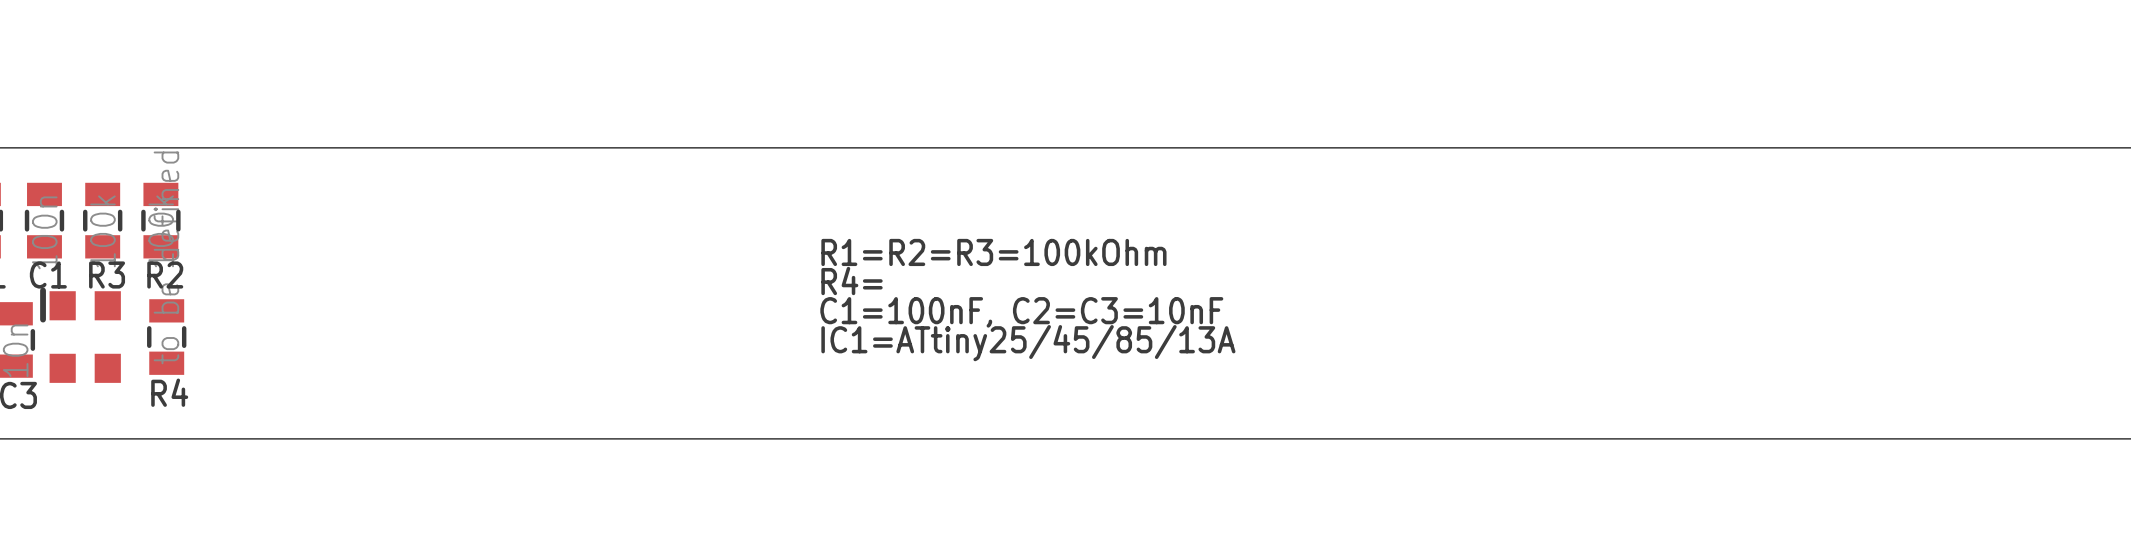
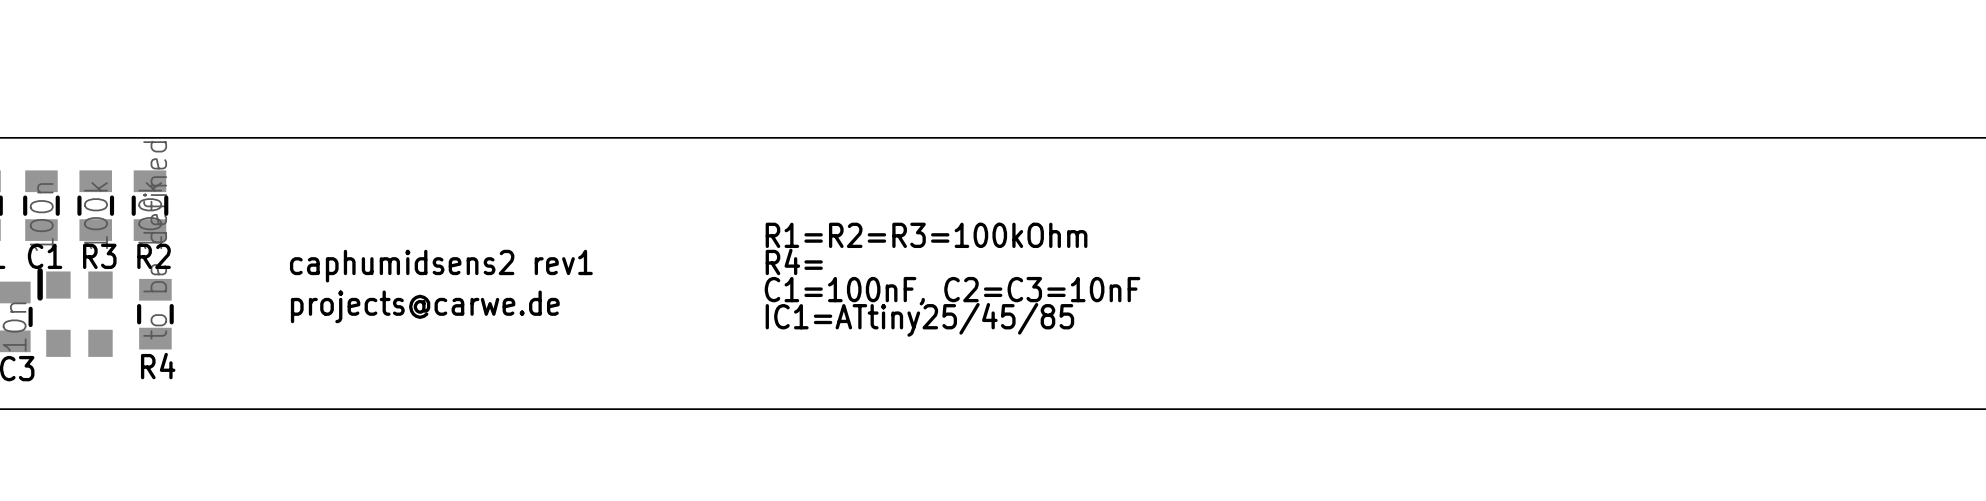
text: none -> caphumidsens2 rev1 (441, 266)
text: none -> projects@carwe.de (425, 306)
text: IC1=ATtiny25/45/85/13A (1028, 343) -> IC1=ATtiny25/45/85 (919, 319)

